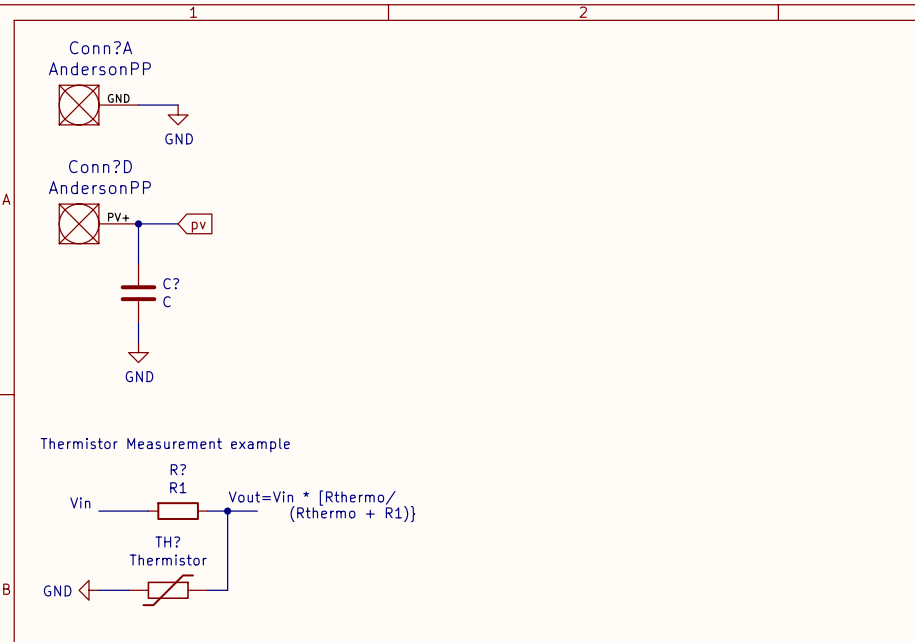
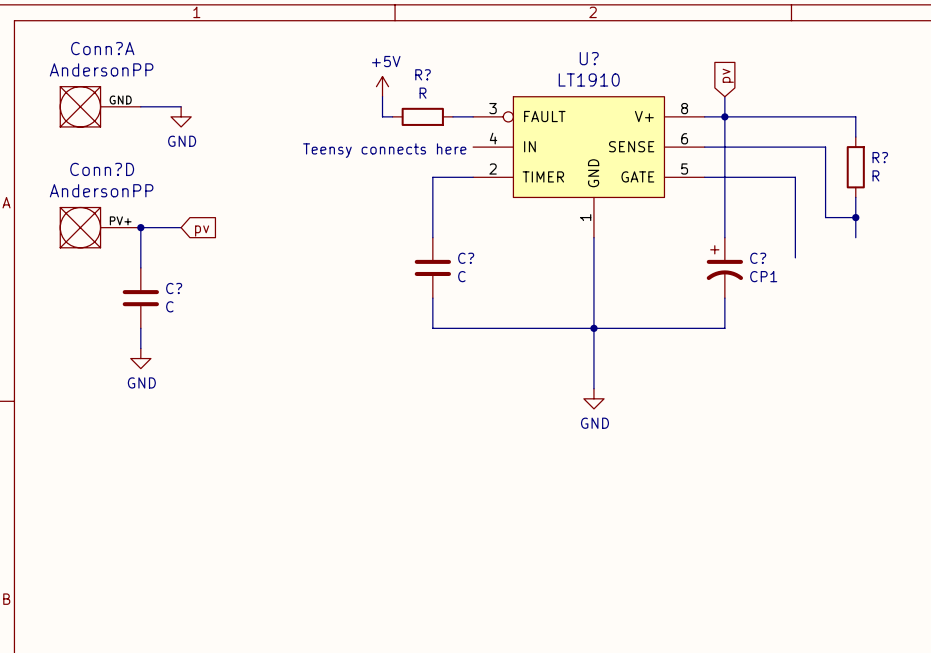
global label: none -> pv (728, 75)
power symbol: none -> +5V (382, 86)
wire: none -> (382, 96) (382, 116) (392, 116)
wire: none -> (724, 96) (724, 237)
R?: none -> R (422, 116)
wire: none -> (452, 116) (473, 116)
wire: none -> (704, 116) (855, 116) (855, 137)
junction: none -> (724, 116)
wire: none -> (704, 147) (825, 147) (825, 217) (855, 217)
text: none -> Teensy connects here (384, 150)
U?: none -> LT1910 (588, 167)
R?: none -> R (855, 167)
wire: none -> (473, 177) (432, 177) (432, 237)
wire: none -> (704, 177) (795, 177) (795, 257)
wire: none -> (855, 197) (855, 237)
junction: none -> (855, 217)
wire: none -> (593, 237) (593, 388)
C?: none -> C (432, 267)
C?: none -> CP1 (724, 267)
wire: none -> (432, 298) (432, 328) (724, 328) (724, 298)
junction: none -> (593, 328)
power symbol: none -> GND (593, 398)
text: Thermistor Measurement example (165, 445) -> none
text: Vout=Vin * [Rthermo/ (312, 498) -> none
text: Vin (80, 502) -> none
wire: (98, 511) (148, 511) -> none
R?: R1 (178, 511) -> none
wire: (207, 511) (257, 511) -> none
wire: (227, 511) (227, 590) (207, 590) -> none
junction: (227, 511) -> none
text: (Rthermo + R1)} (352, 514) -> none
power symbol: GND (88, 590) -> none
wire: (98, 590) (128, 590) -> none
TH?: Thermistor (168, 590) -> none

